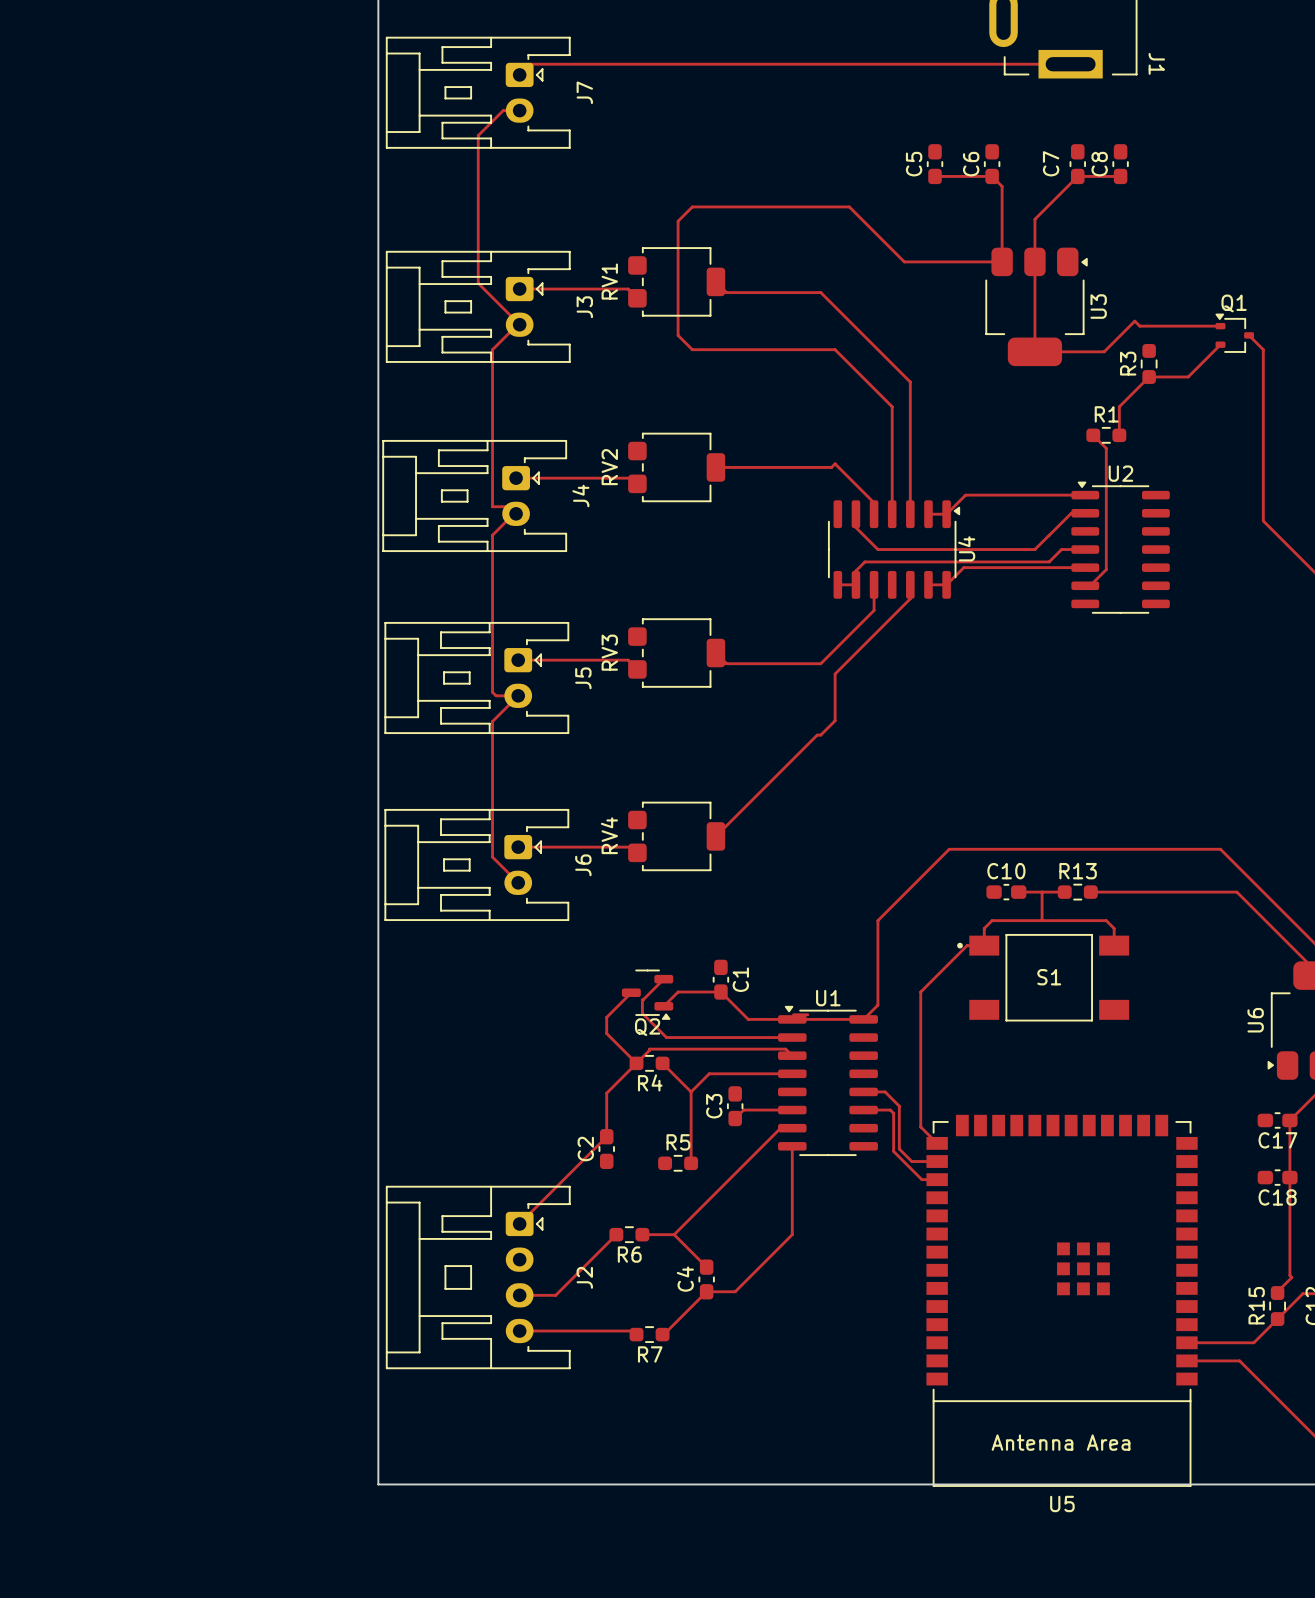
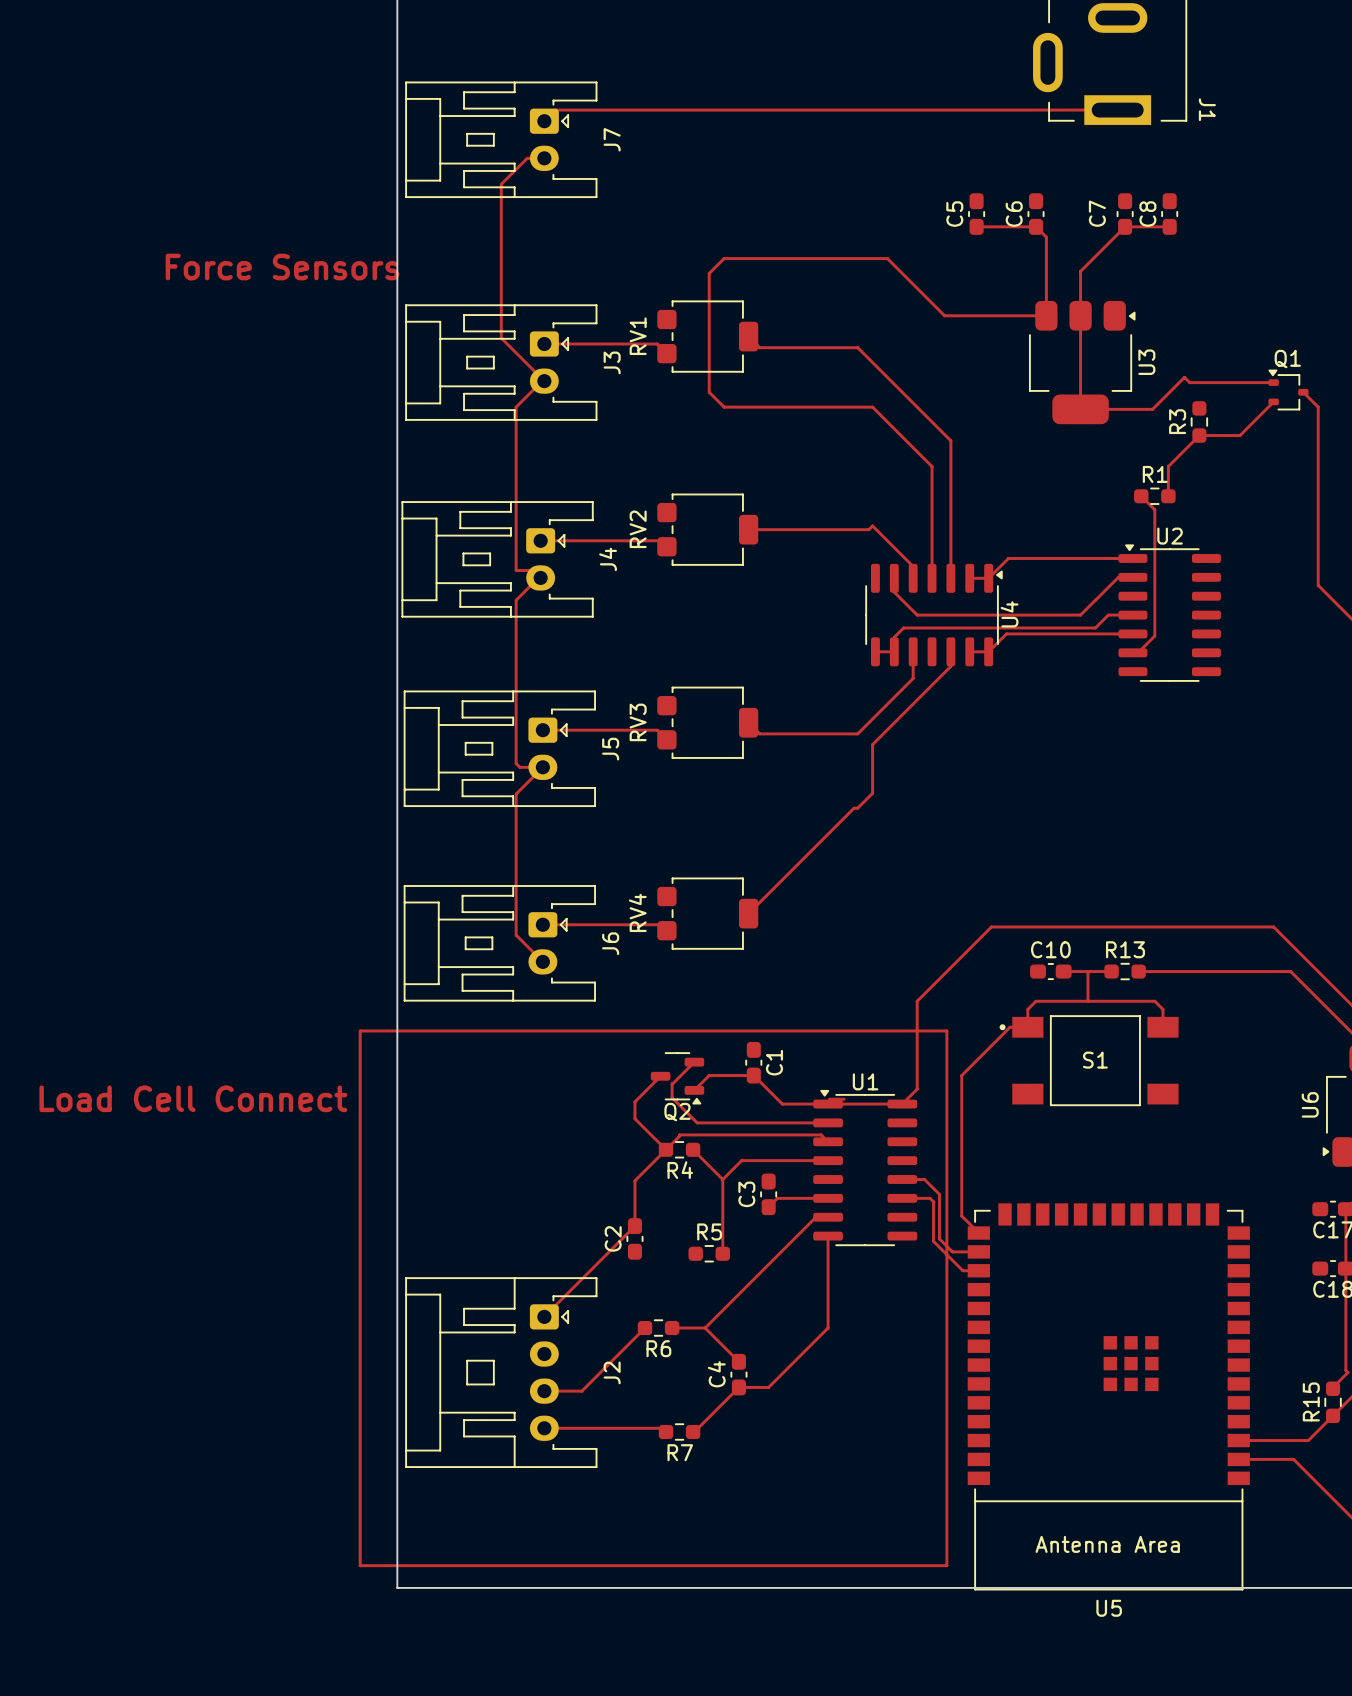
text: none -> Force Sensors (282, 267)
track: none -> (360, 1030) (946, 1030) (946, 1565) (360, 1565) (360, 1030)
text: none -> Load Cell Connect (193, 1098)

